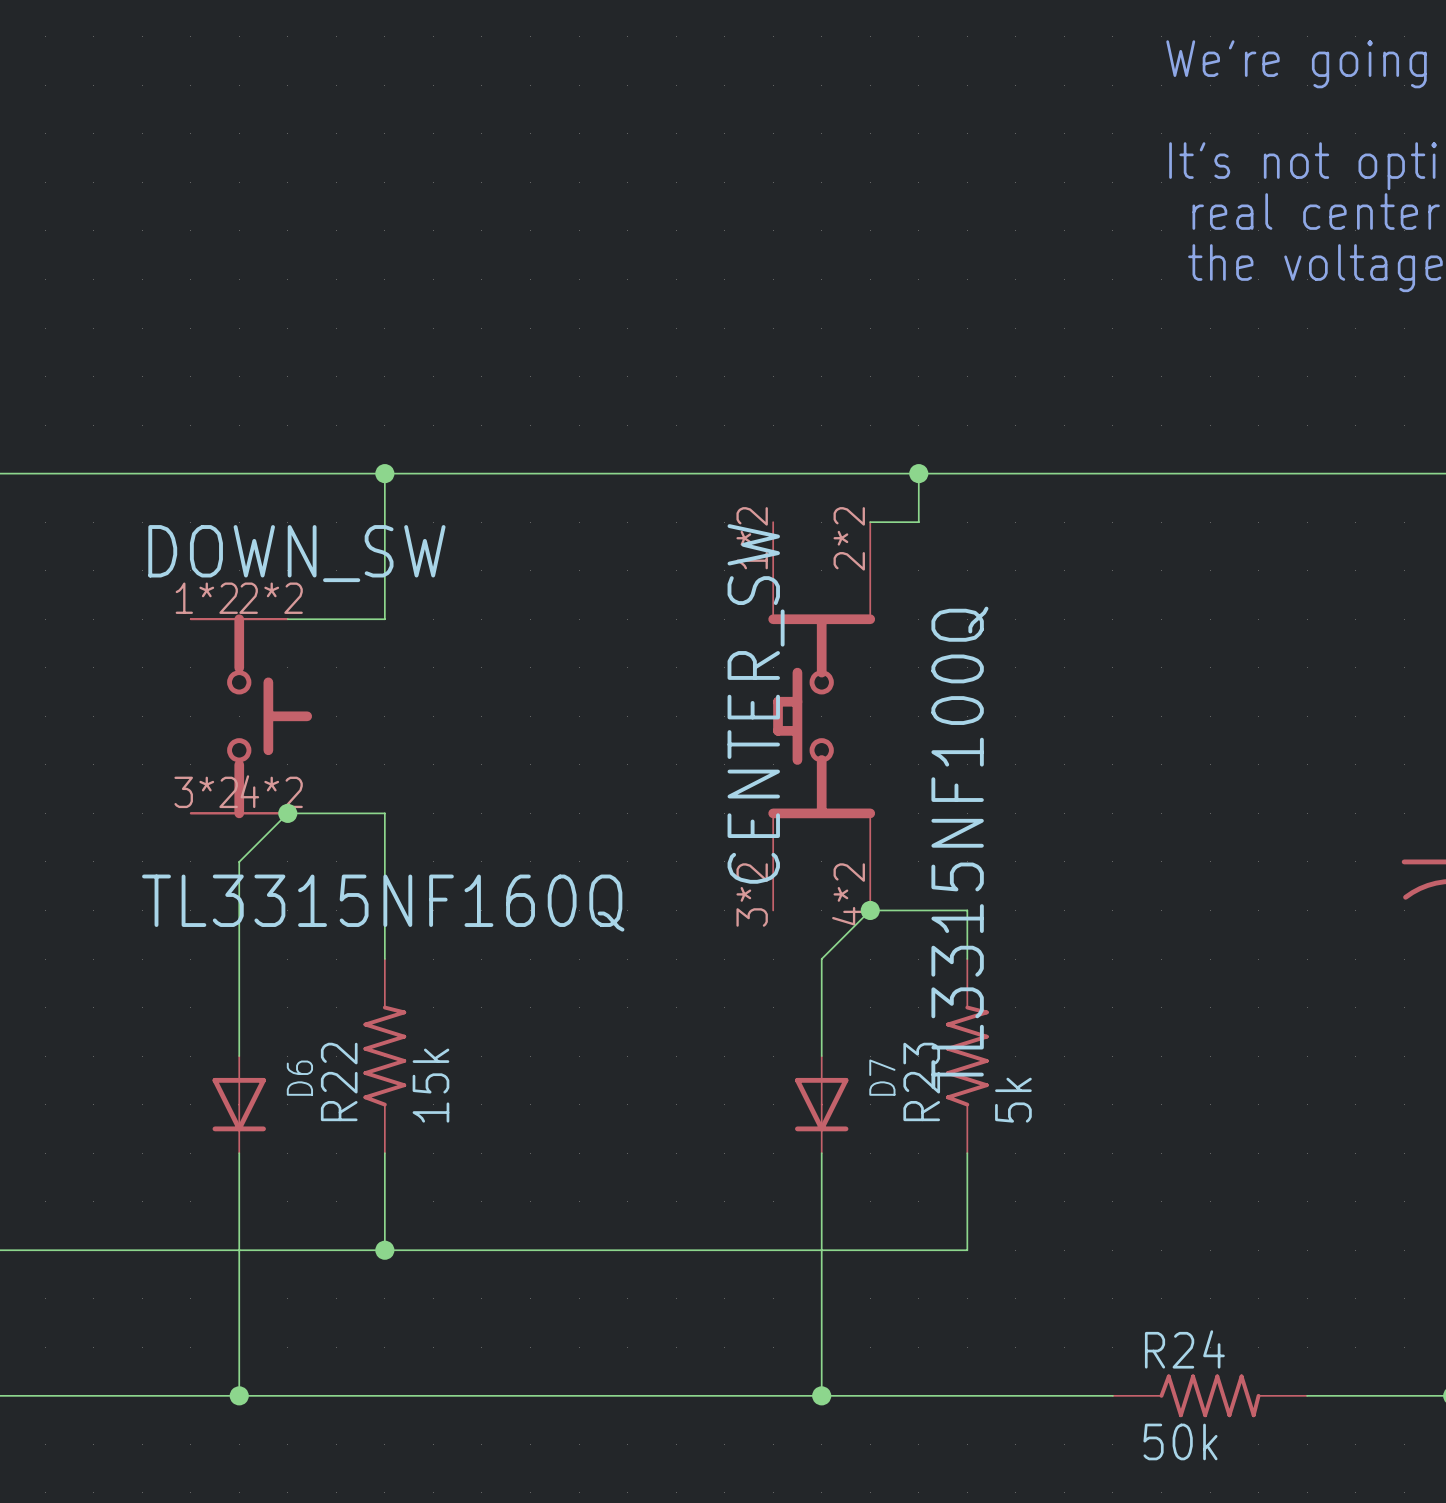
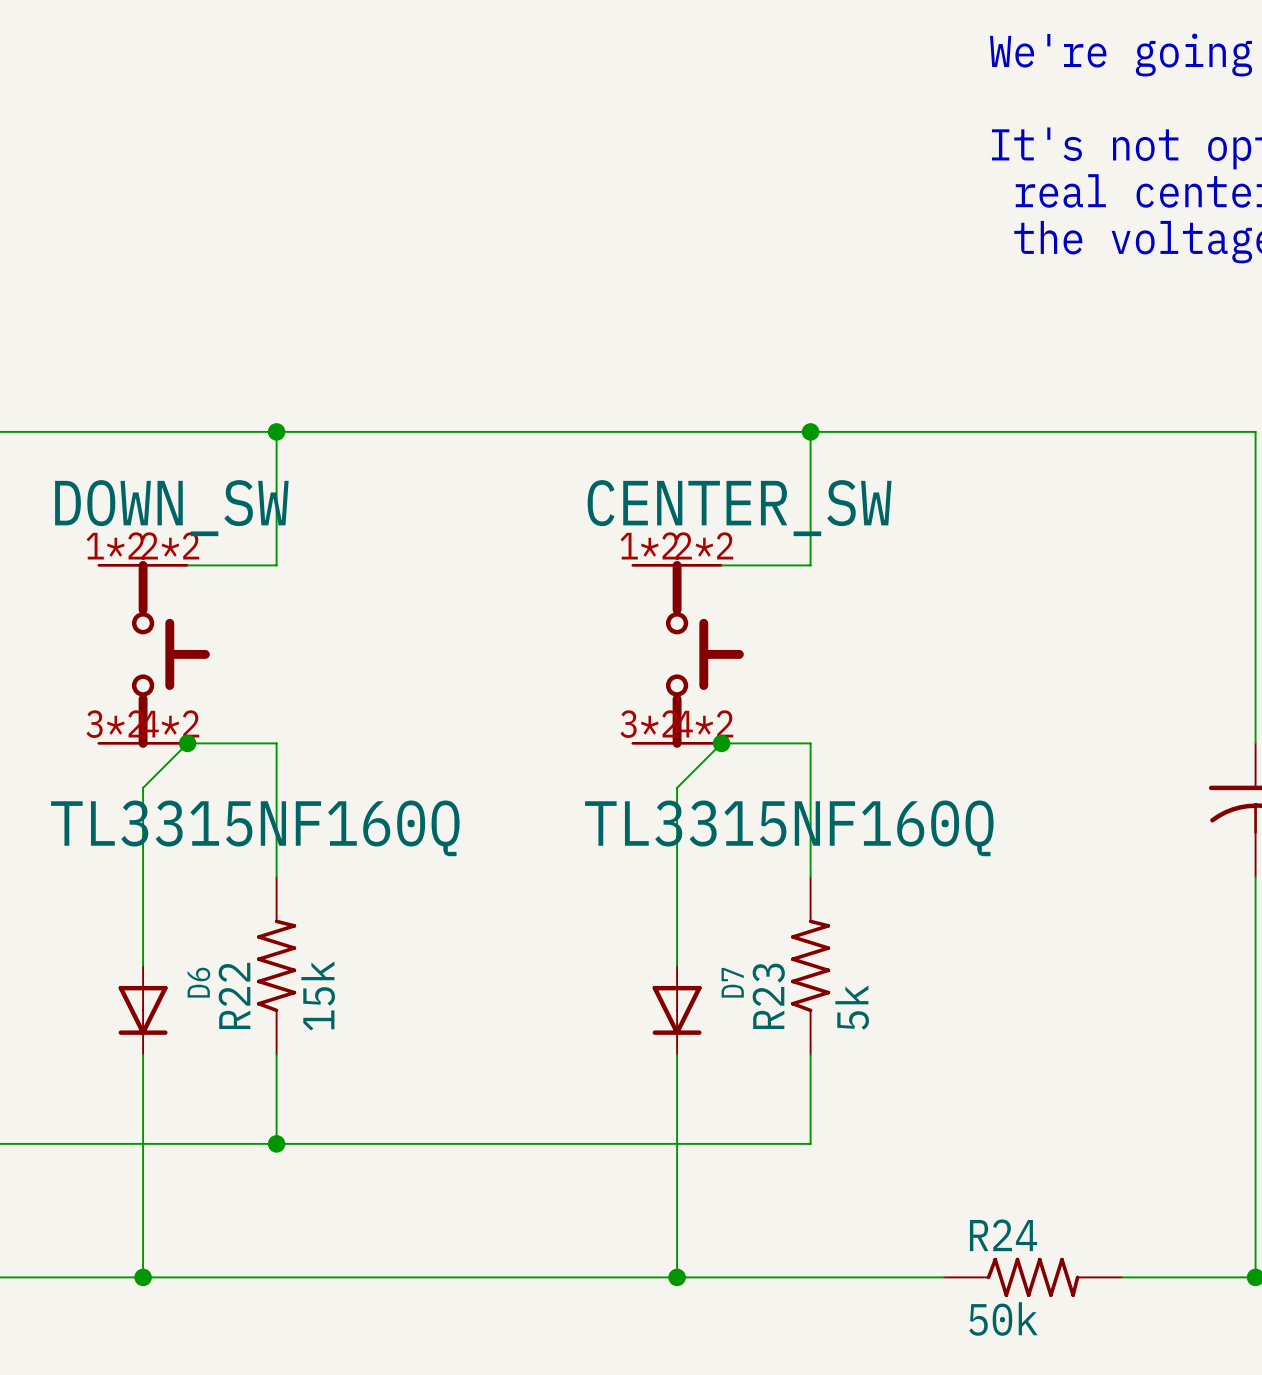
wire: (918, 473) (918, 522) (870, 522) -> none
junction position: (918, 473) -> (810, 431)
wire: none -> (810, 431) (810, 565) (721, 565)
CENTER_SW symbol: [768, 522, 876, 911] -> [631, 560, 744, 748]
CENTER_SW name position: CENTER_SW (756, 703) -> CENTER_SW (739, 508)
junction position: (870, 910) -> (721, 743)
wire: (967, 910) (870, 910) (821, 959) -> (810, 832) (810, 743) (721, 743) (677, 787) (677, 876)

